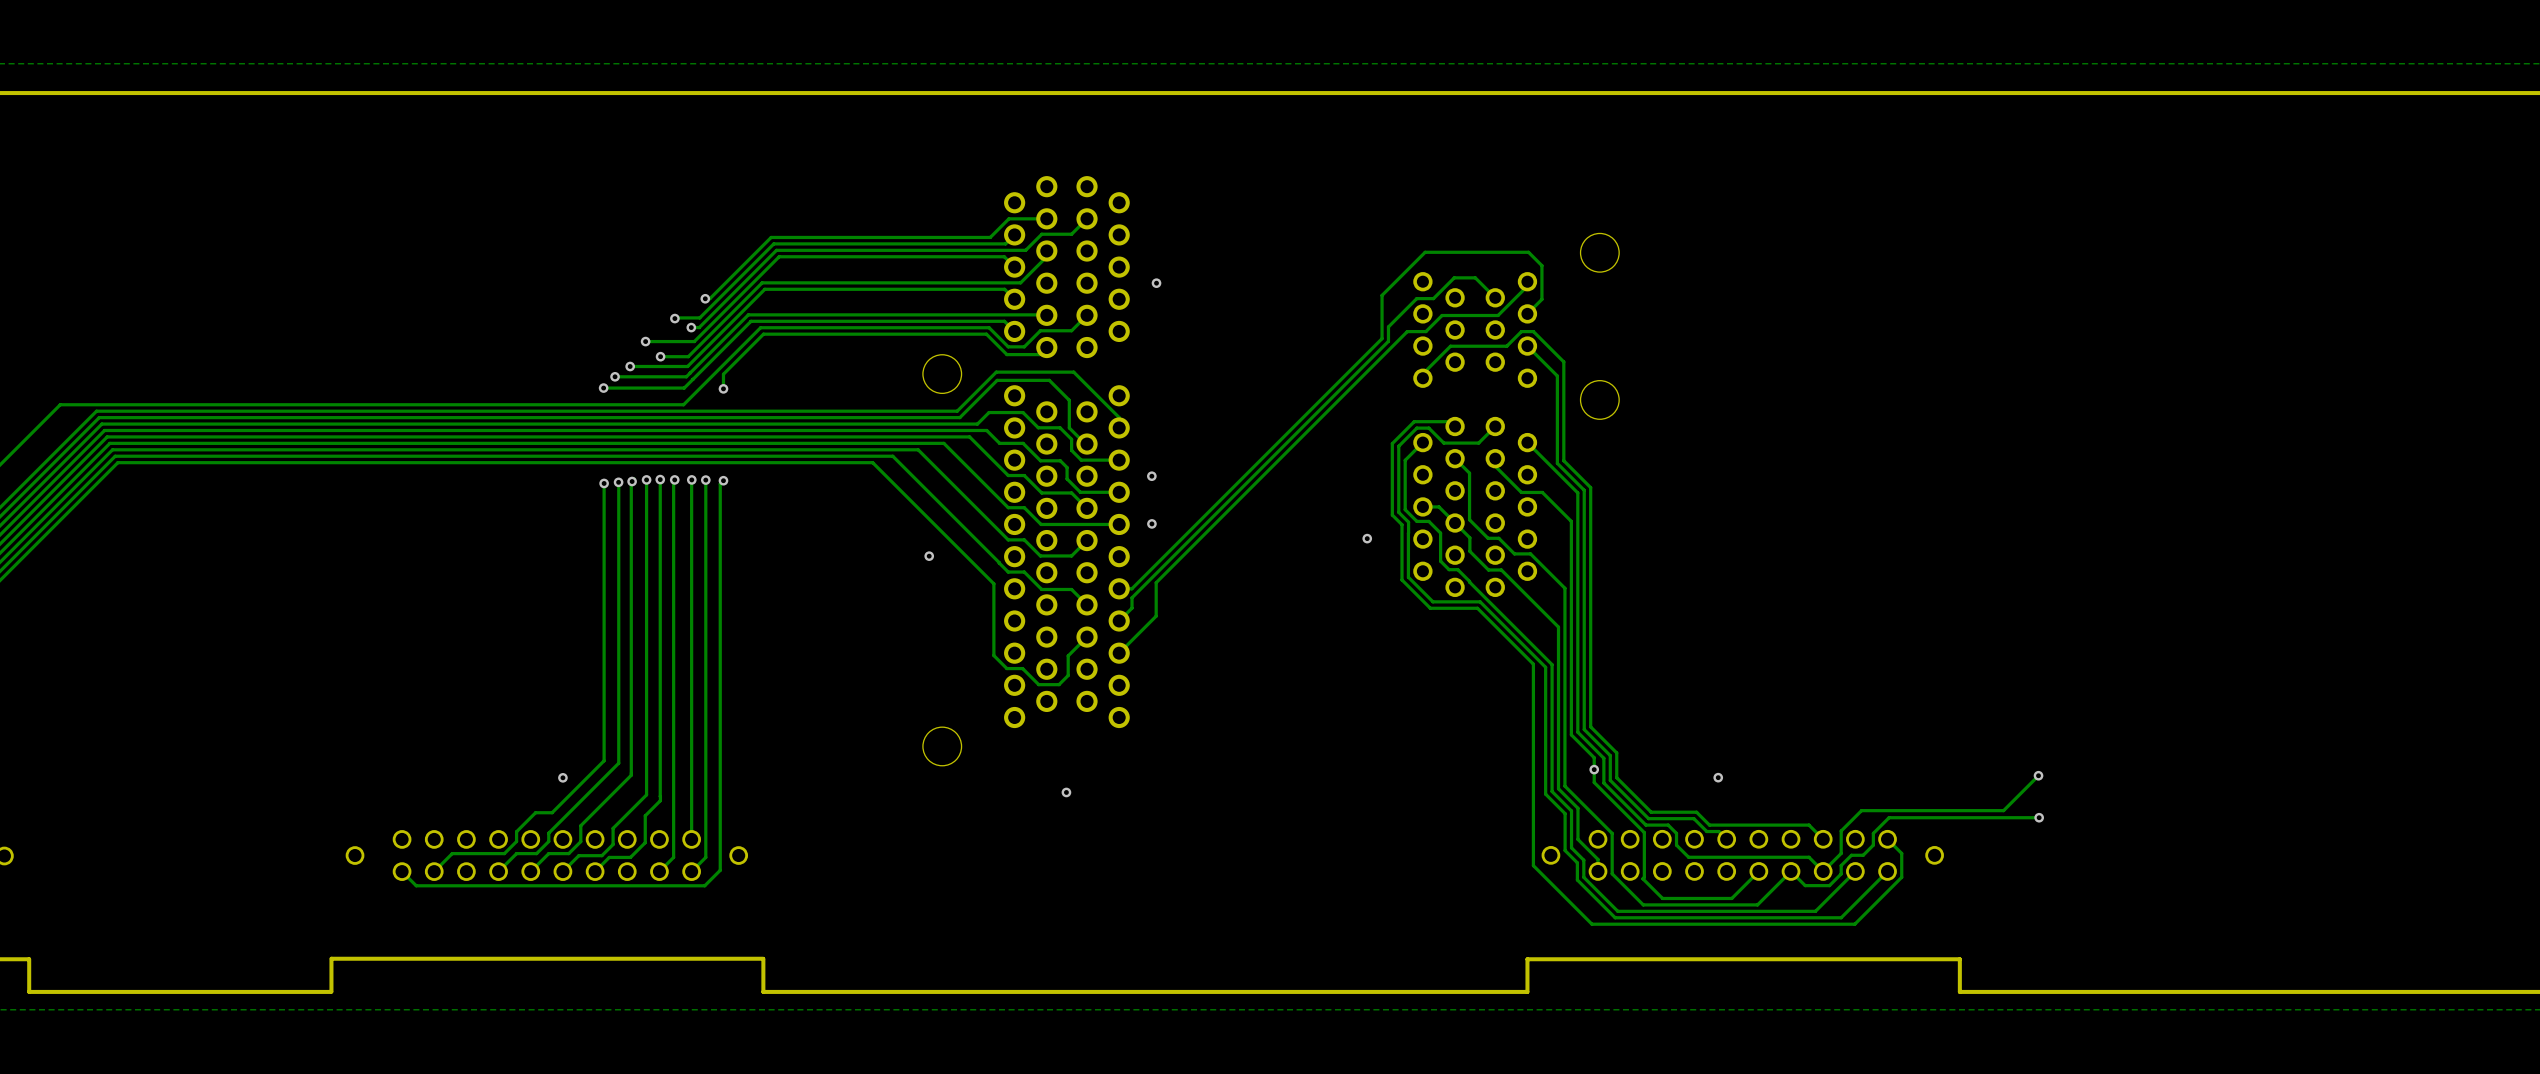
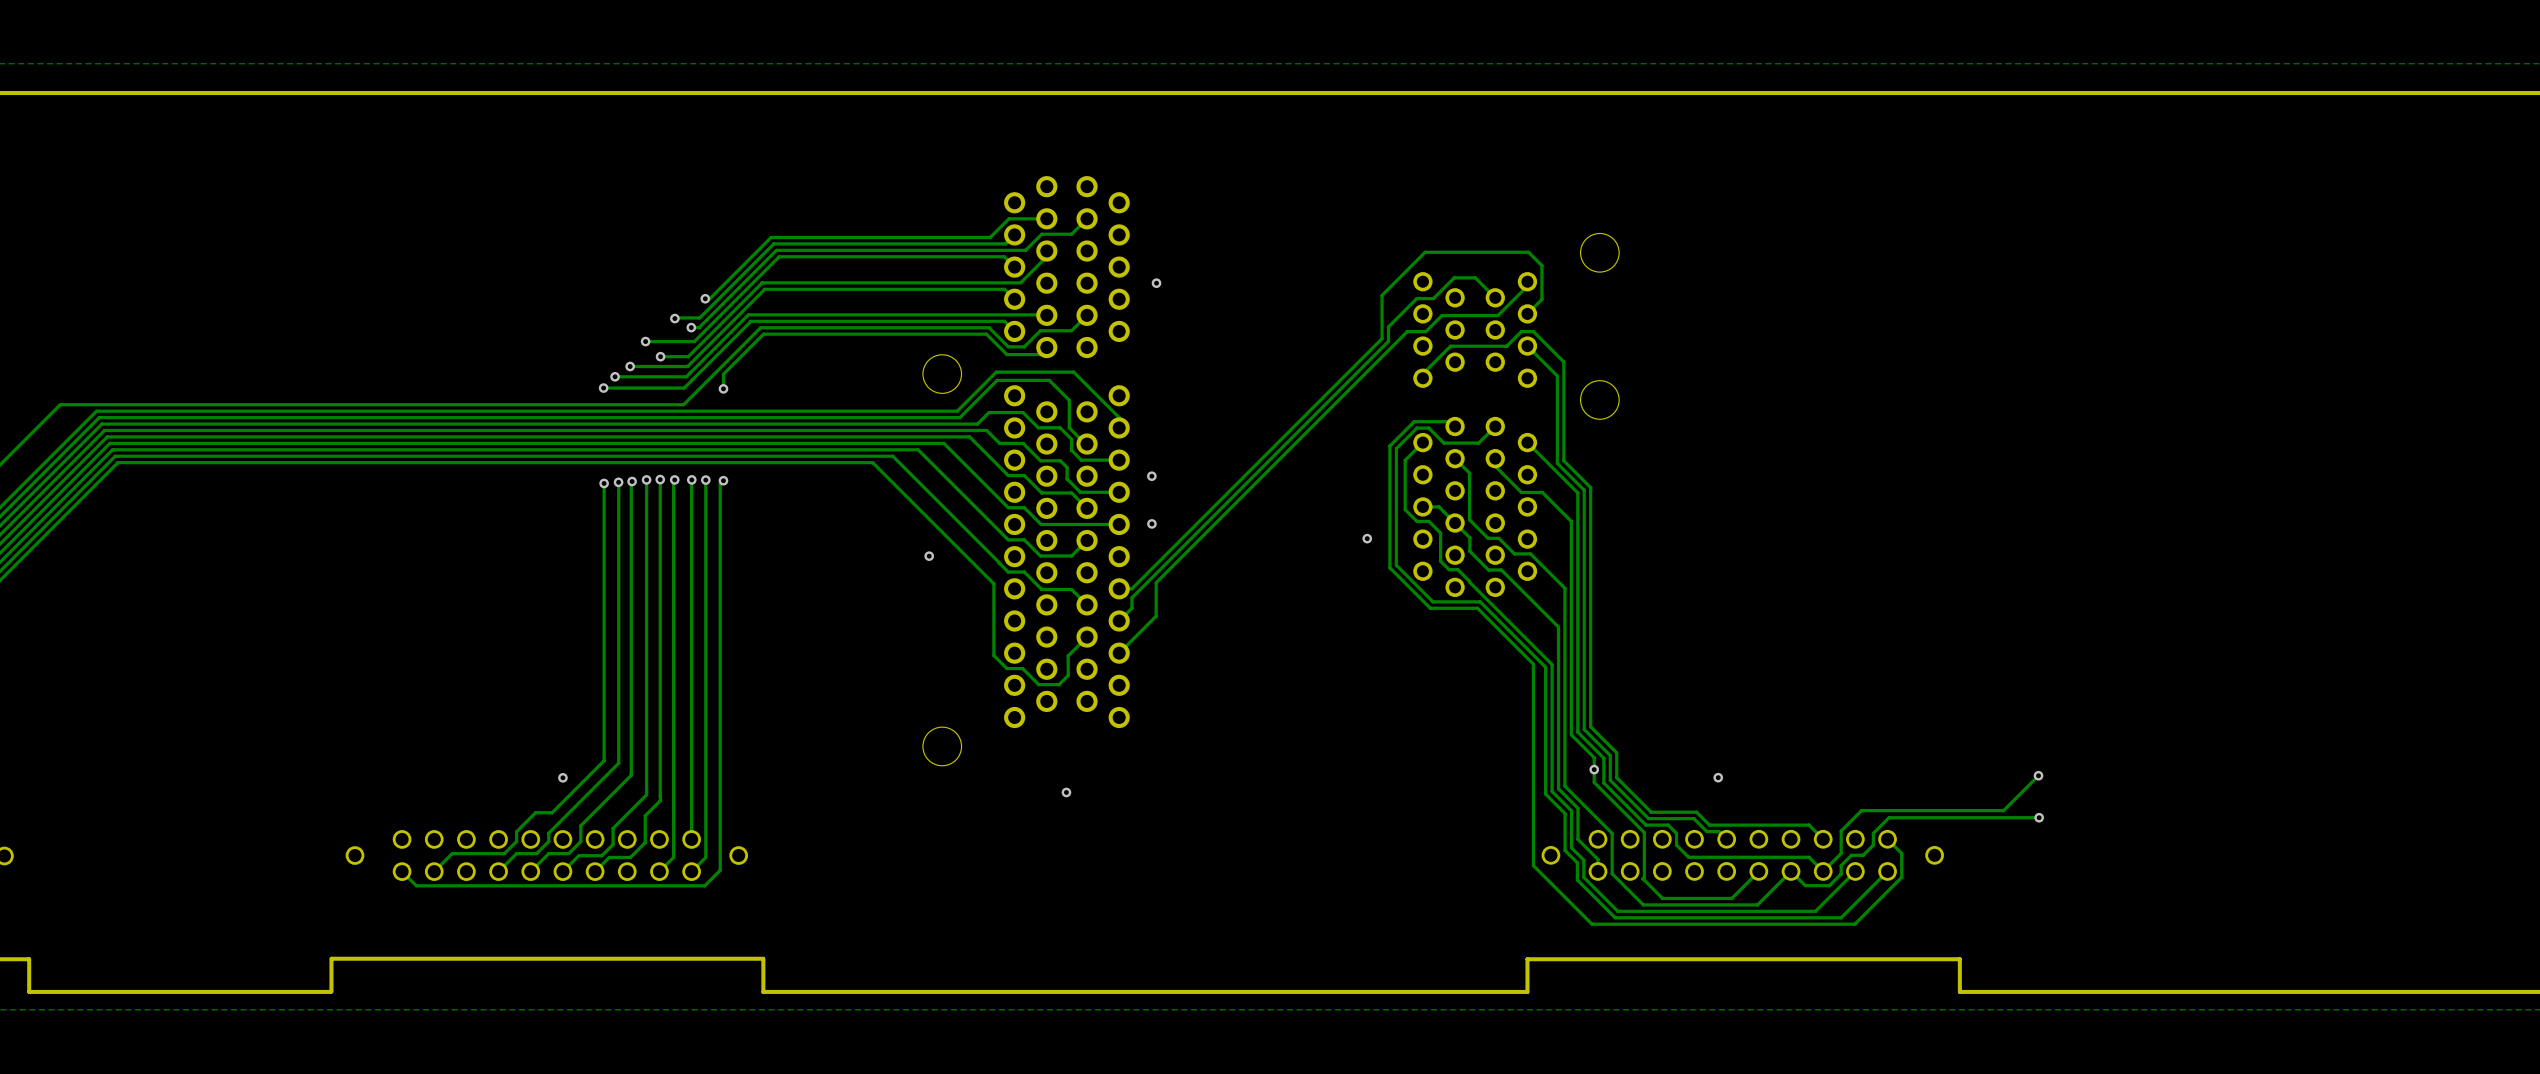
track: (1392, 443) (1392, 515) (1401, 524) (1401, 579) -> (1392, 443) (1389, 445) (1389, 567) (1401, 579)
track: (1398, 446) (1398, 512) (1408, 522) (1408, 532) -> (1398, 446) (1396, 448) (1396, 565) (1408, 577)
track: (1408, 533) (1408, 577) -> none

